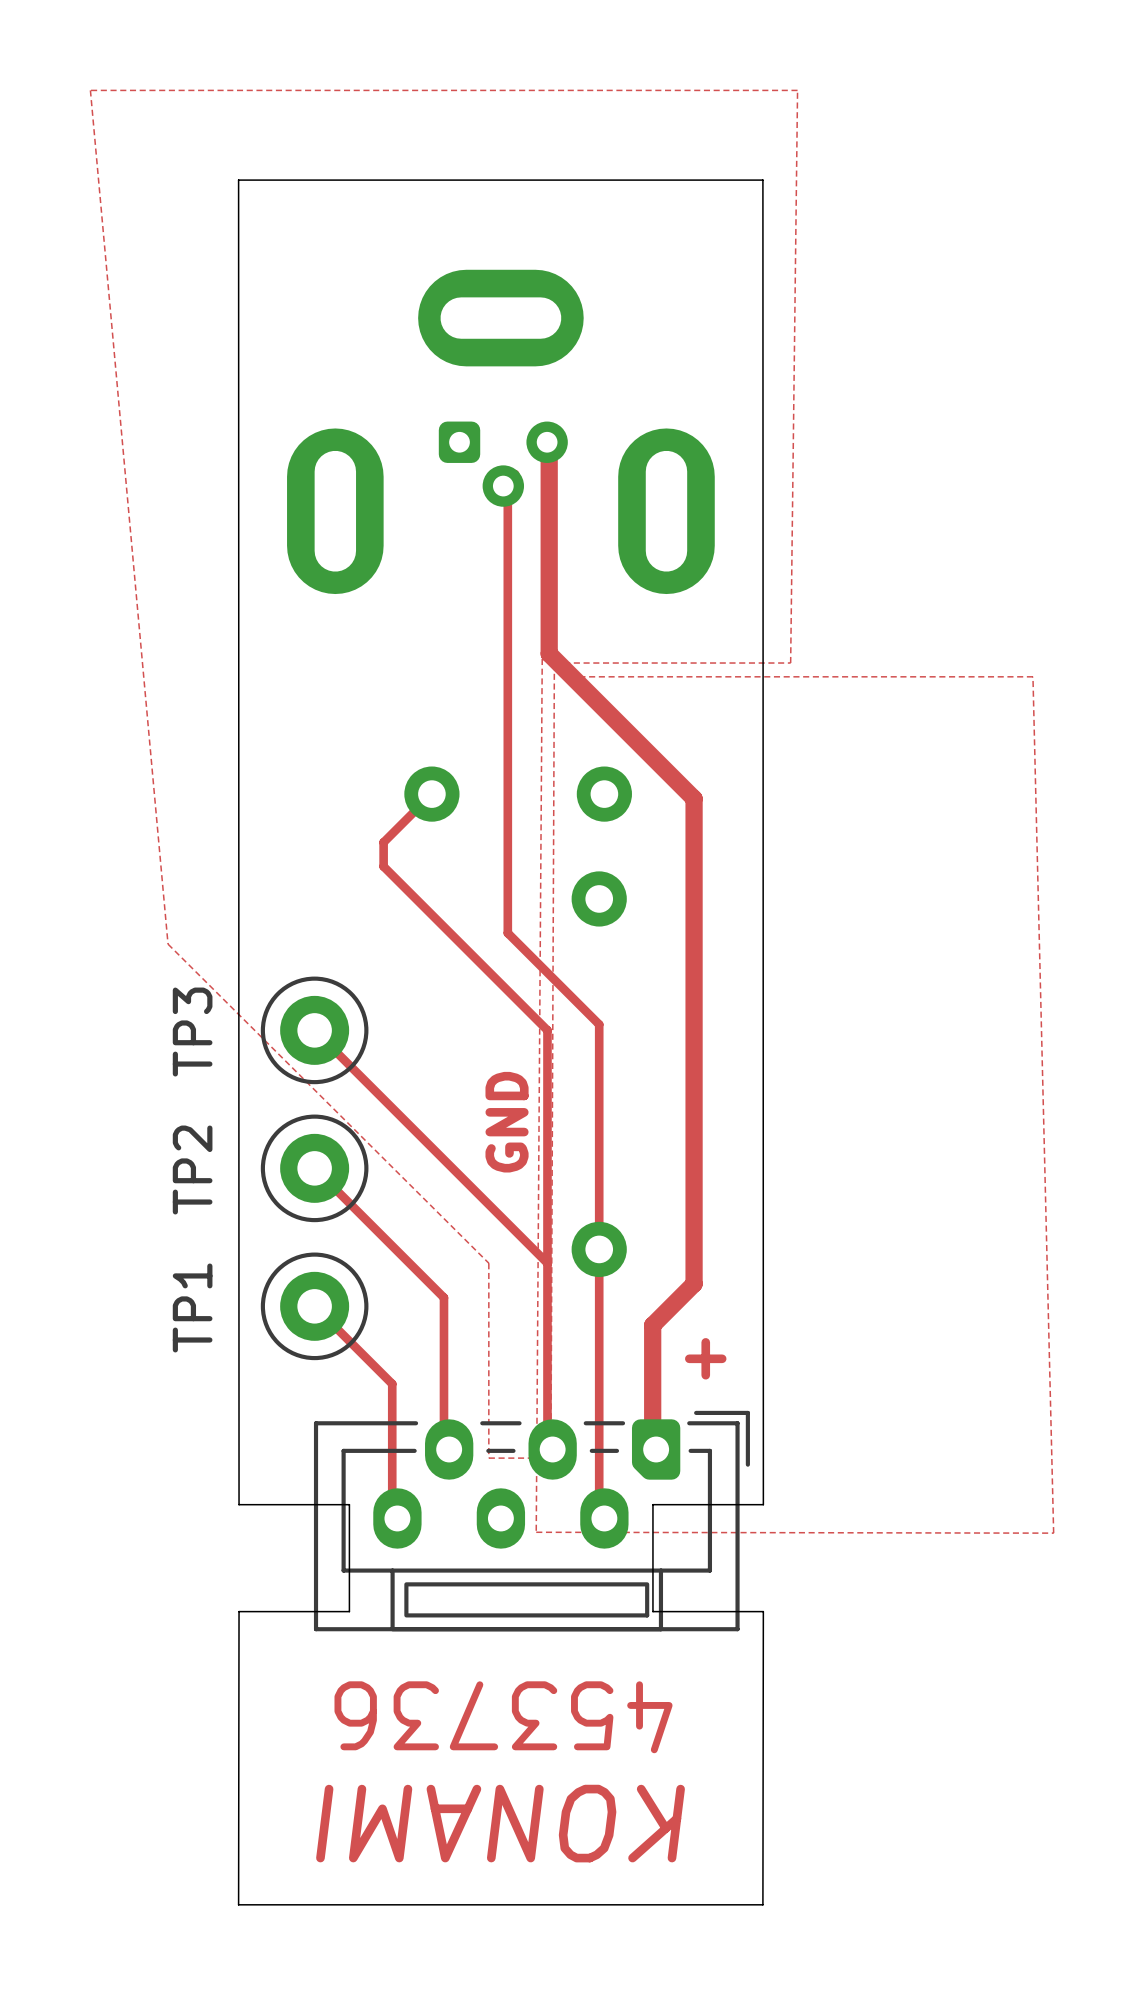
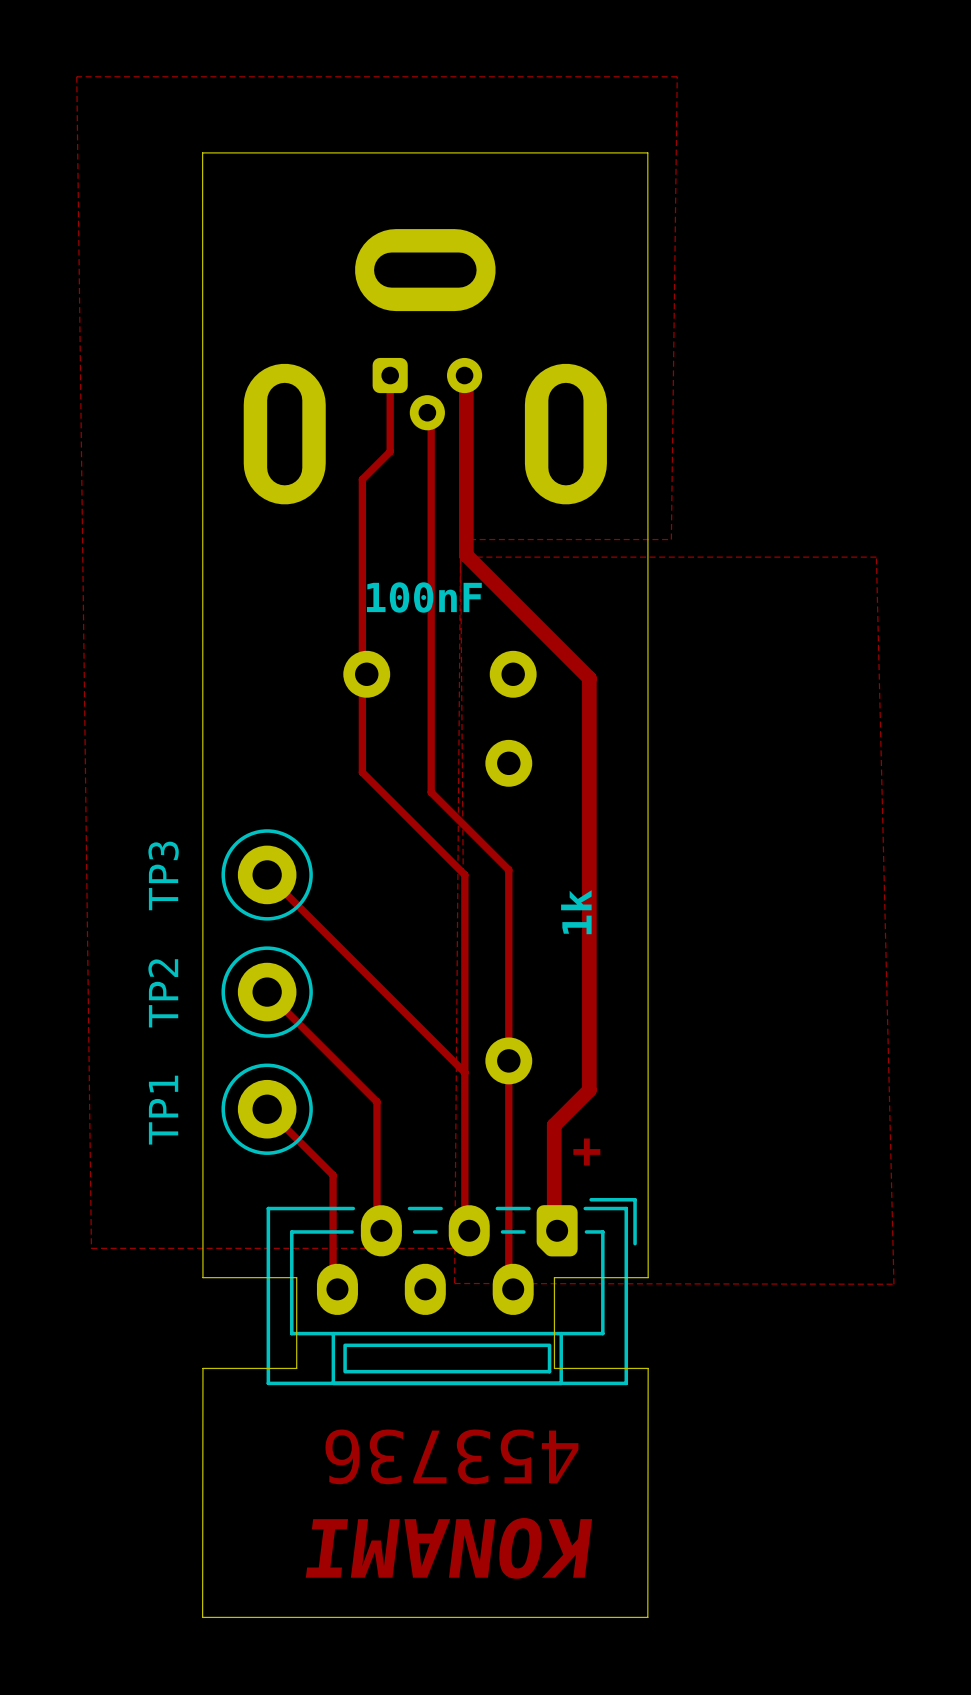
top zone outline: (90, 90) (168, 944) (488, 1263) (488, 1458) (550, 1458) (554, 663) (790, 663) (797, 90) -> (76, 76) (91, 1248) (466, 1248) (460, 539) (671, 539) (677, 76)
top zone outline: (542, 649) (576, 676) (1032, 676) (1053, 1533) (536, 1532) (542, 649) -> (460, 557) (454, 1283) (893, 1284) (876, 557) (460, 557)
text: none -> 100nF (424, 597)
top track: (431, 794) (383, 842) (383, 866) (426, 909) -> (390, 375) (390, 451) (362, 479) (362, 772)
text: none -> 1k (576, 912)
text: GND (507, 1122) -> none

